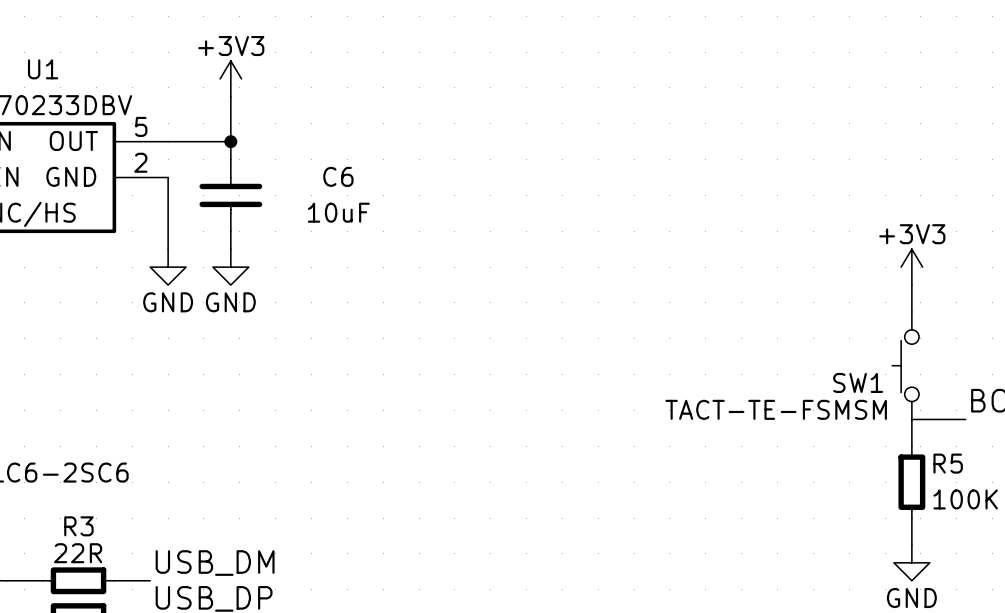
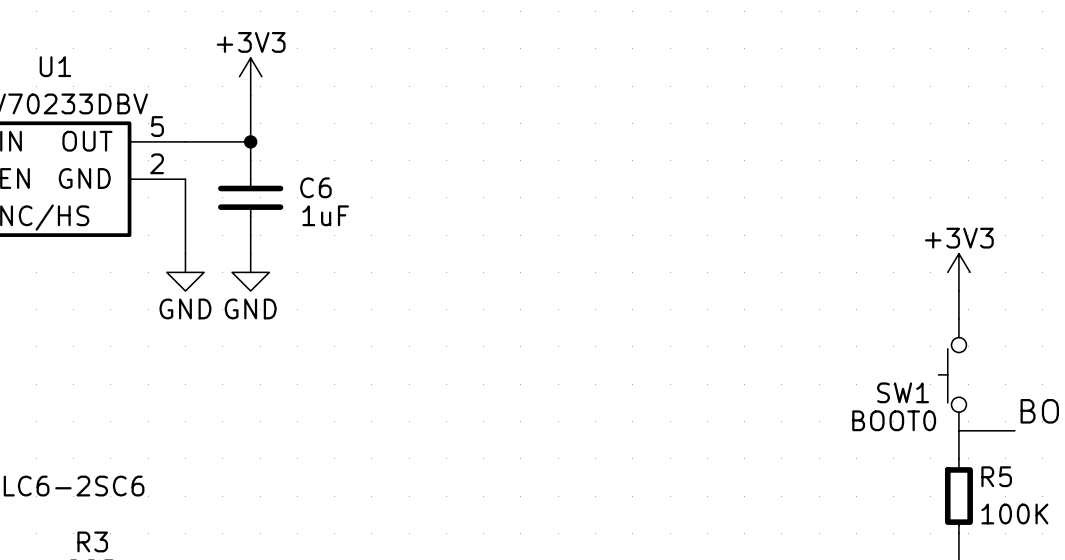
C6 name position: C6 (338, 176) -> C6 (315, 187)
C6 value: 10uF (338, 212) -> 1uF (325, 215)
SW1 value: TACT-TE-FSMSM (776, 409) -> BOOT0 (894, 420)

